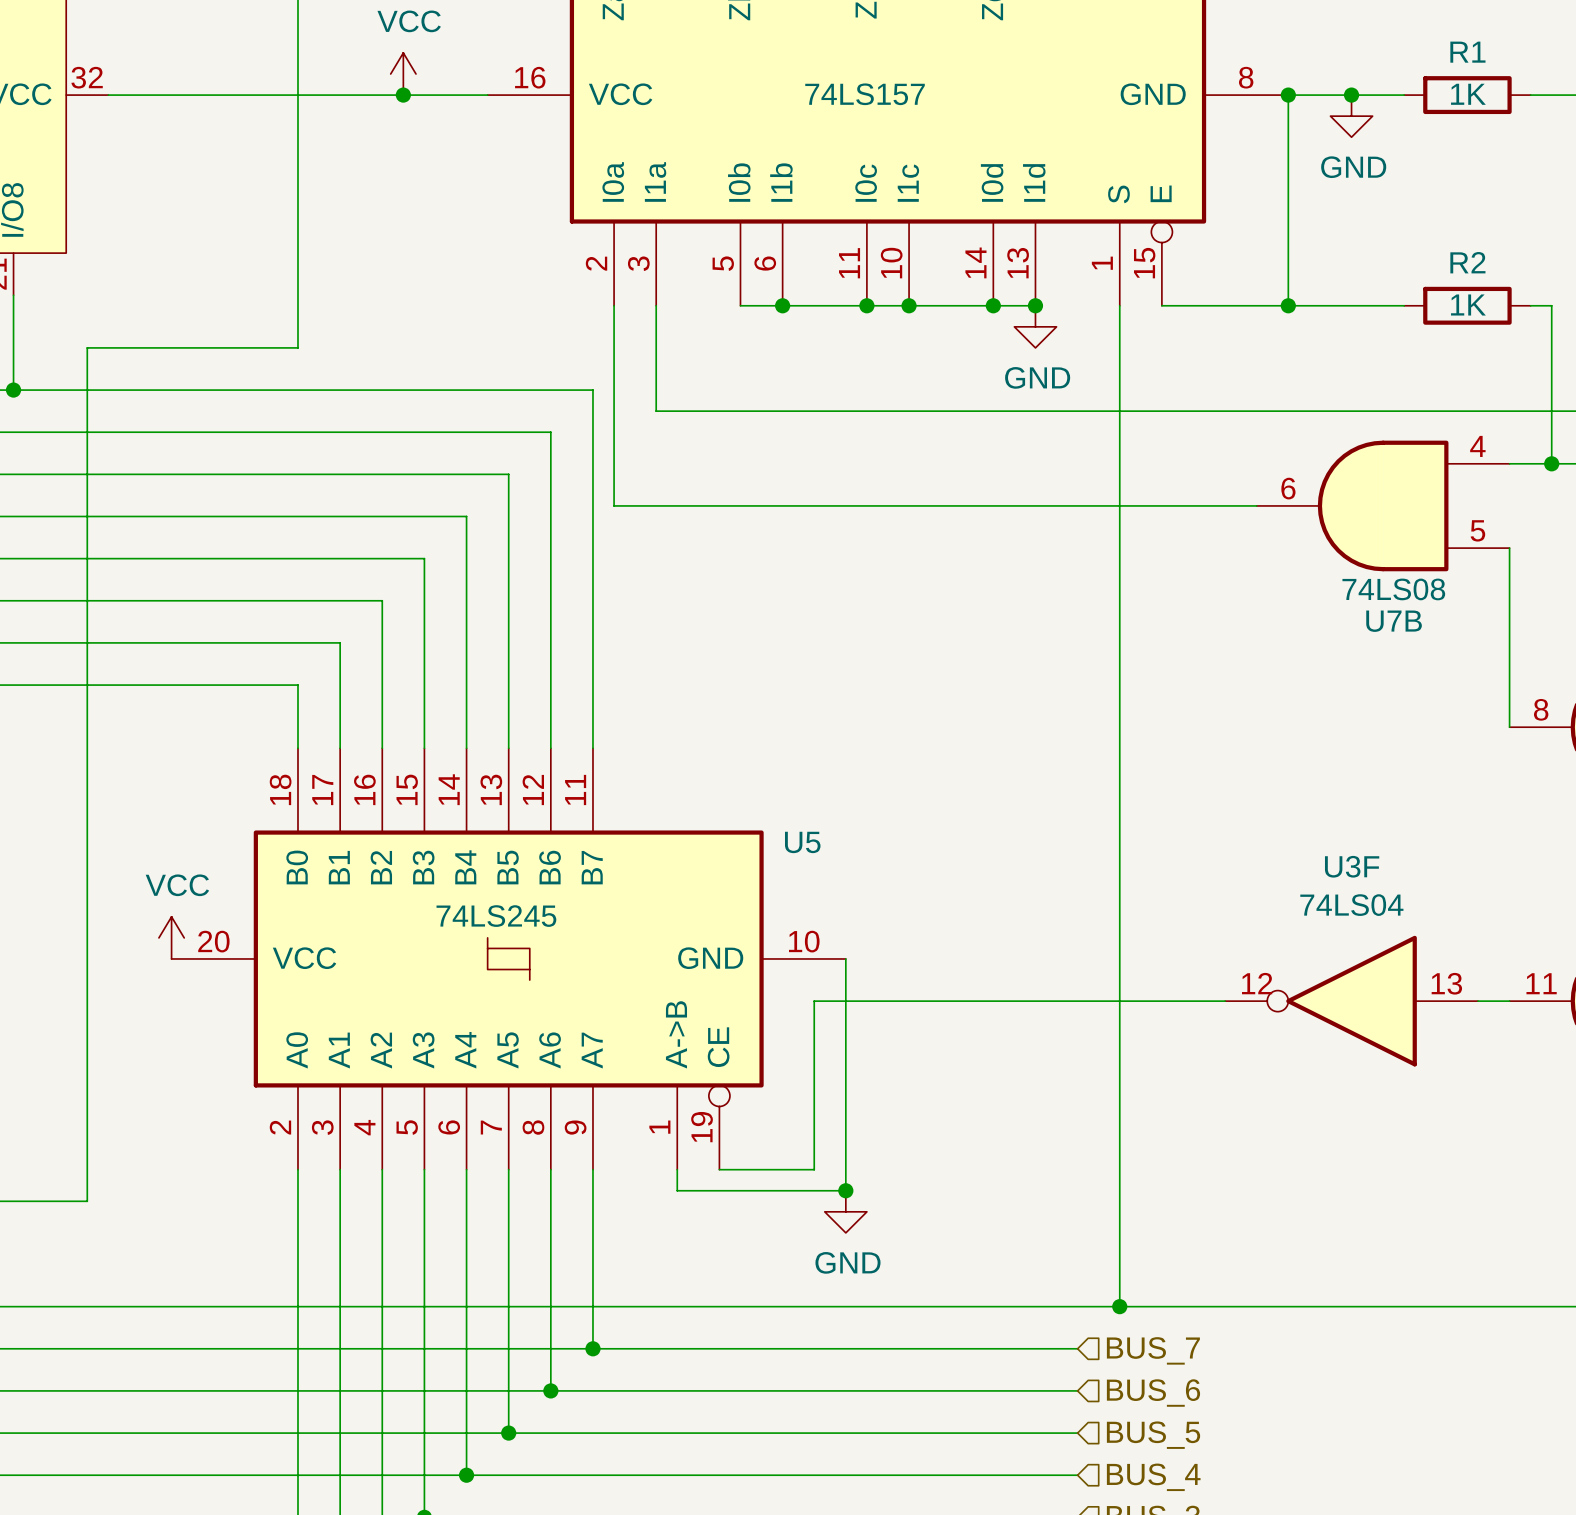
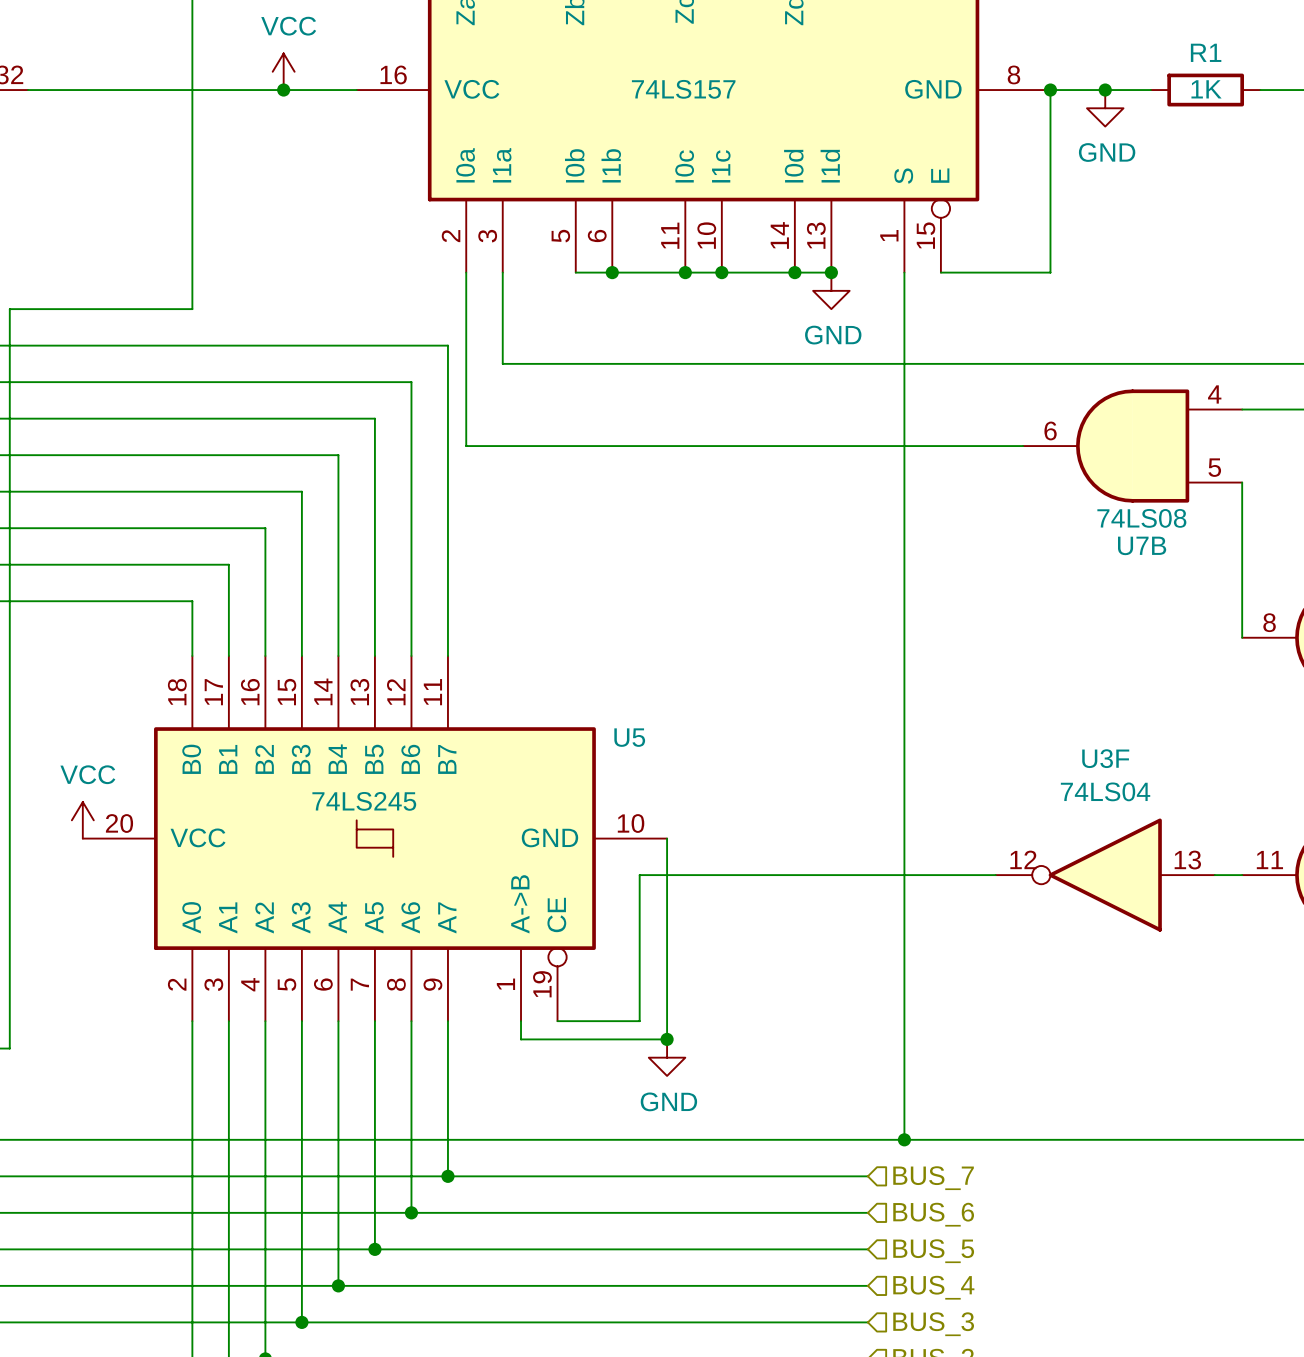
wire: (1288, 305) (1404, 305) -> none
junction: (1288, 305) -> none
R2: 1K (1467, 305) -> none
wire: (1530, 305) (1551, 305) (1551, 463) -> none
junction: (1551, 463) -> none

